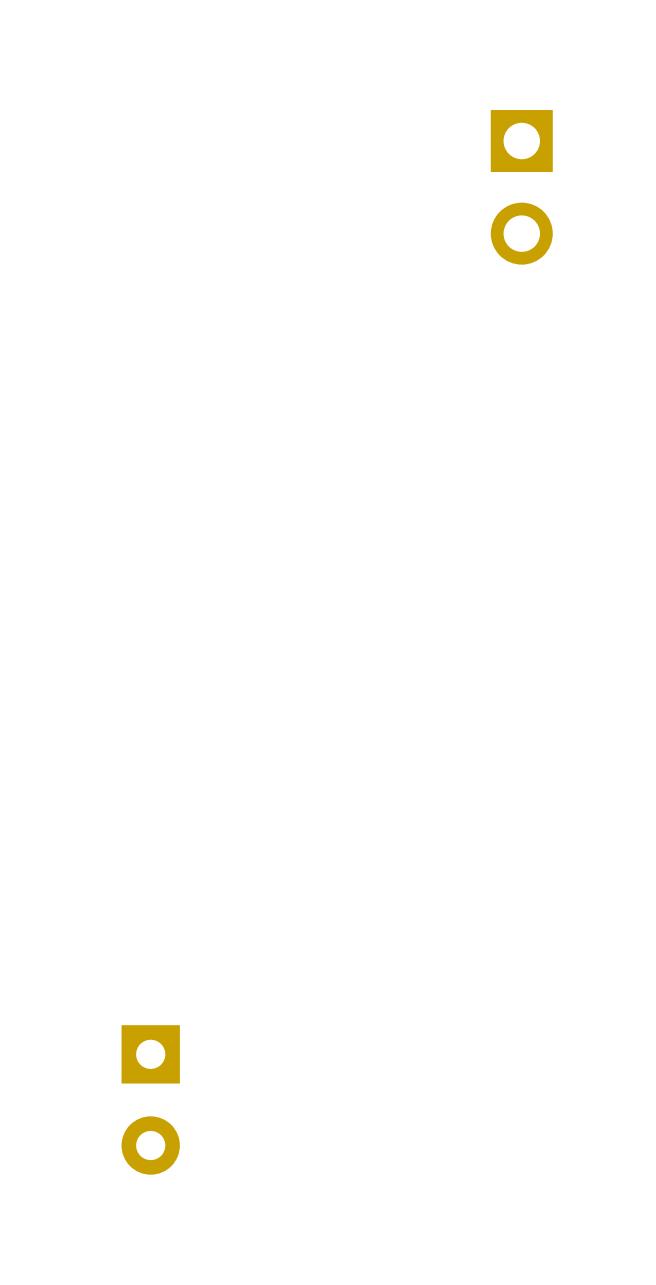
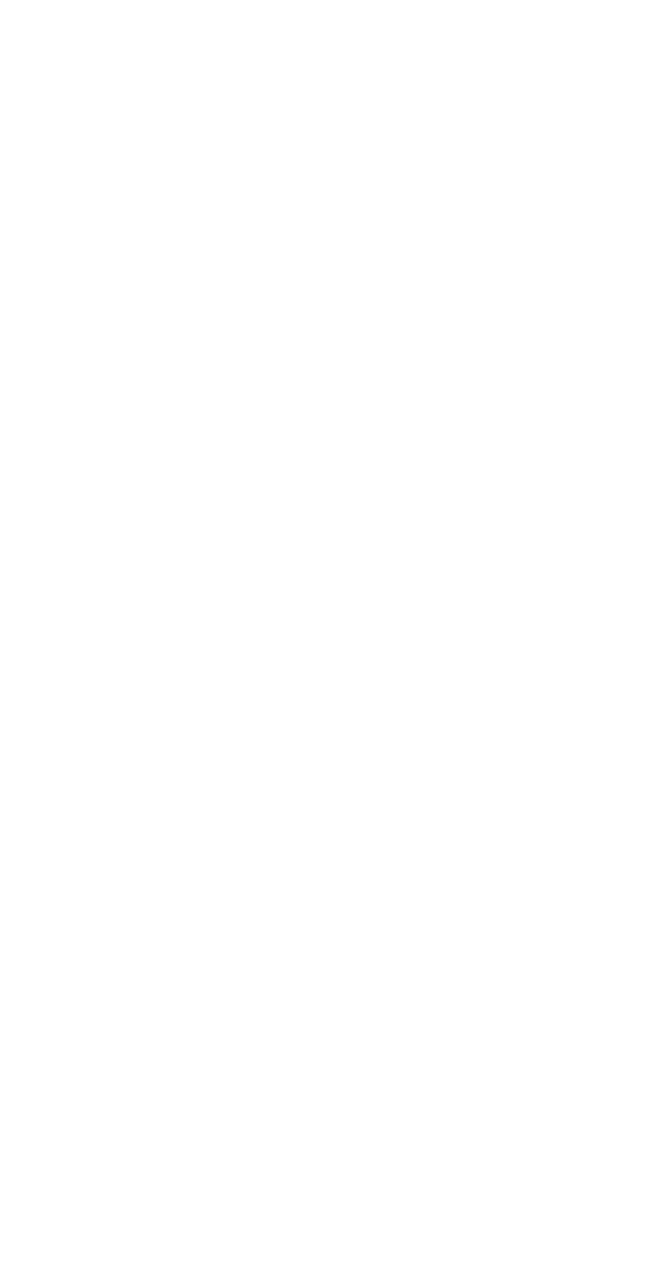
part: (521, 187) -> none
part: (150, 1099) -> none

